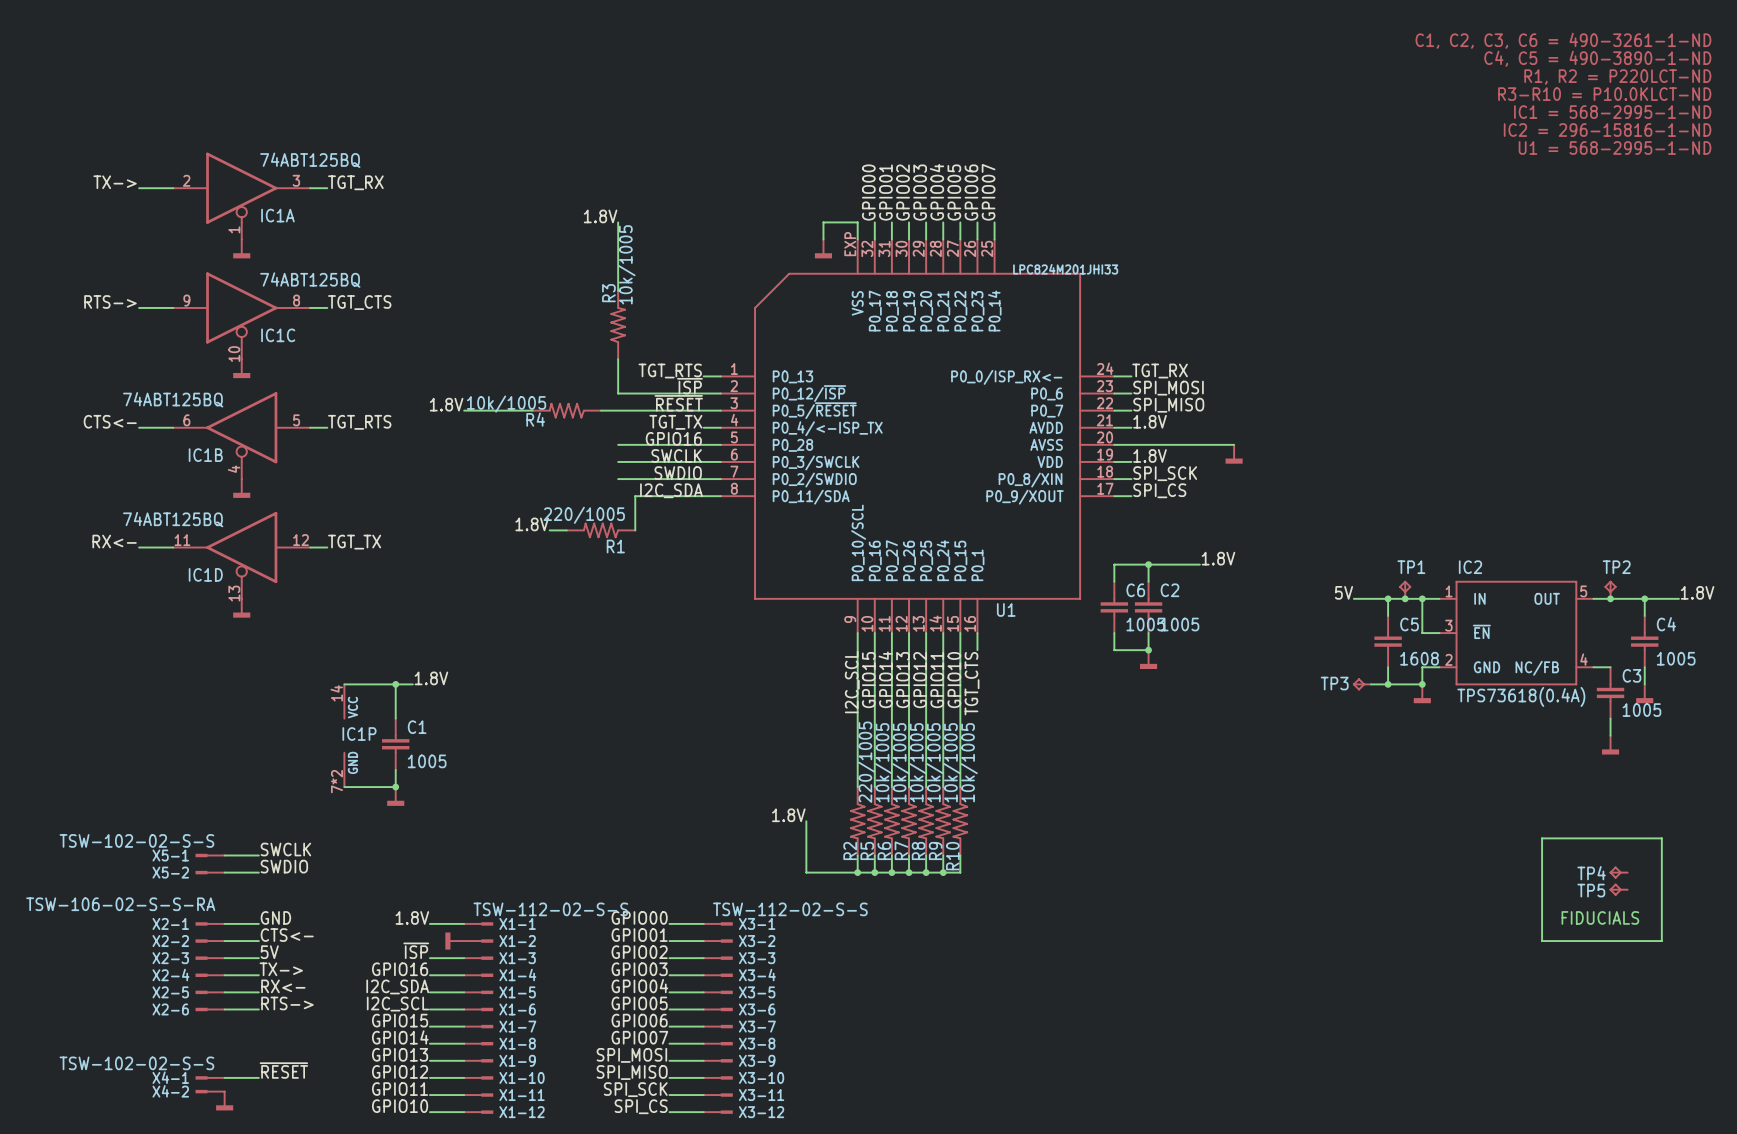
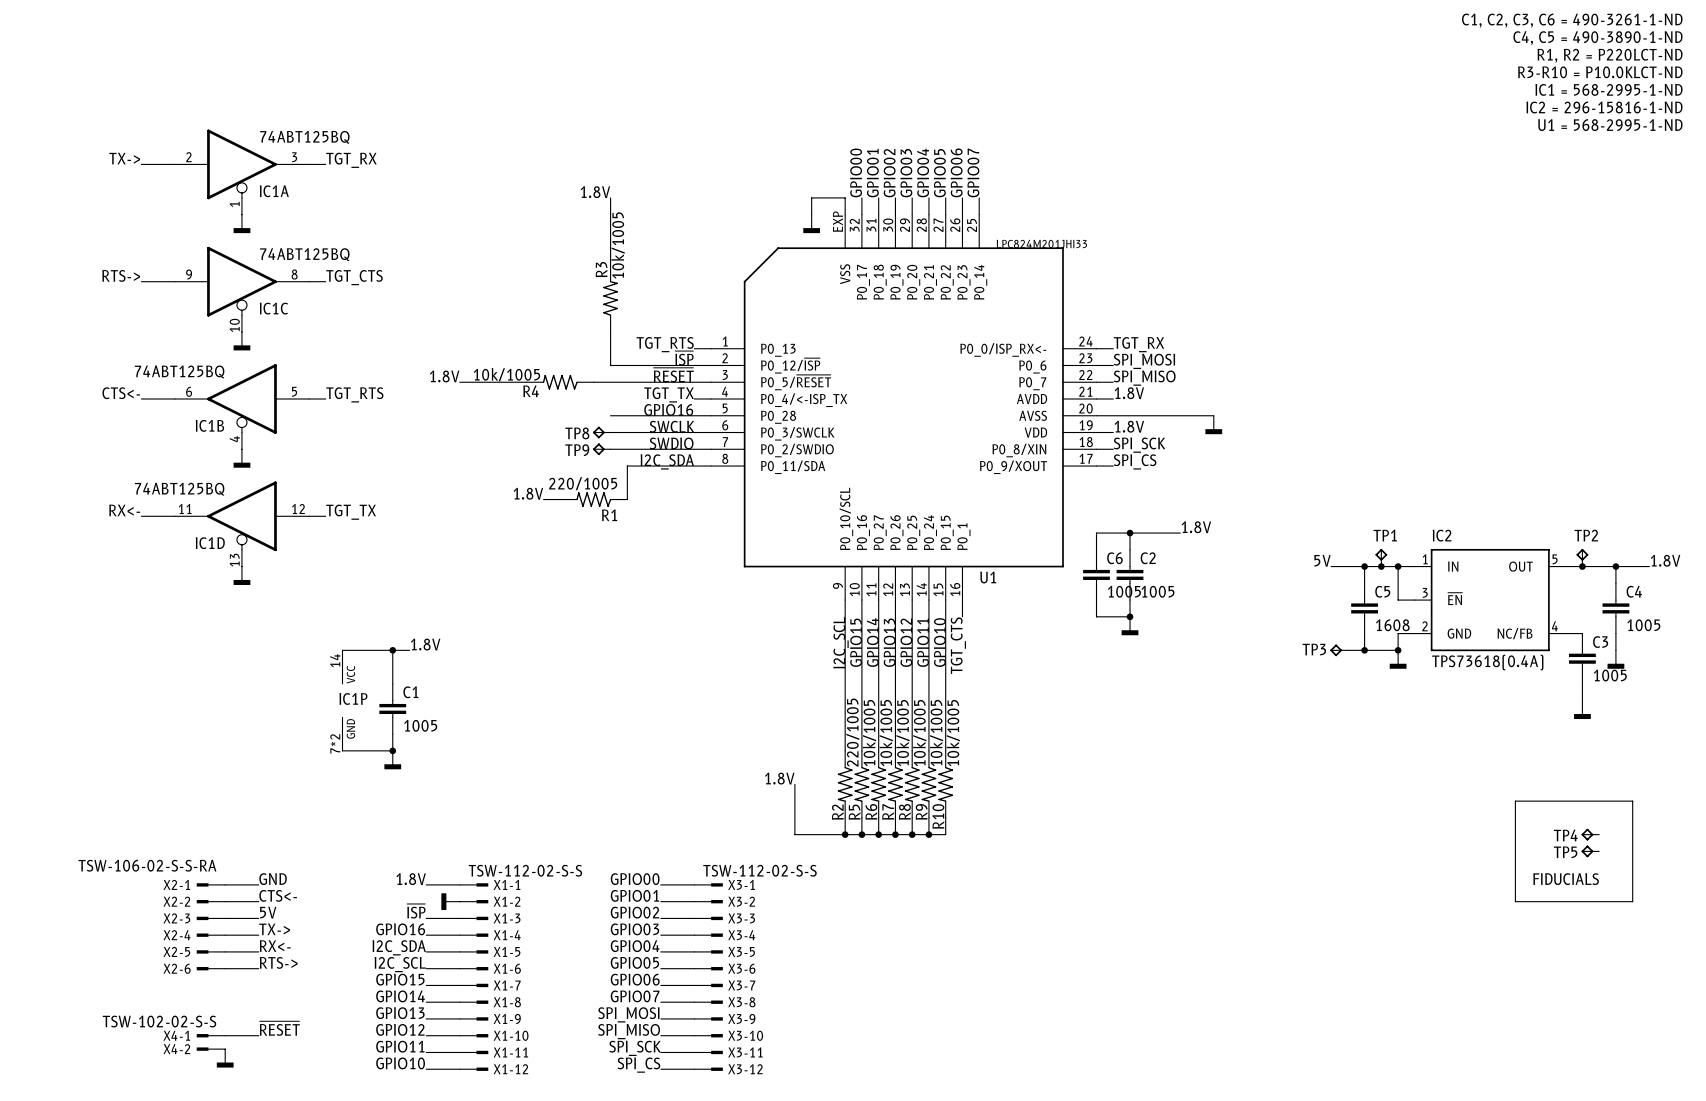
TP8: none -> (601, 432)
TP9: none -> (601, 449)
label: SWCLK (285, 849) -> none
X5-1: TSW-102-02-S-S (210, 855) -> none
wire: (224, 855) (258, 855) -> none
label: SWDIO (284, 866) -> none
X5-2: (210, 872) -> none
wire: (224, 872) (258, 872) -> none

